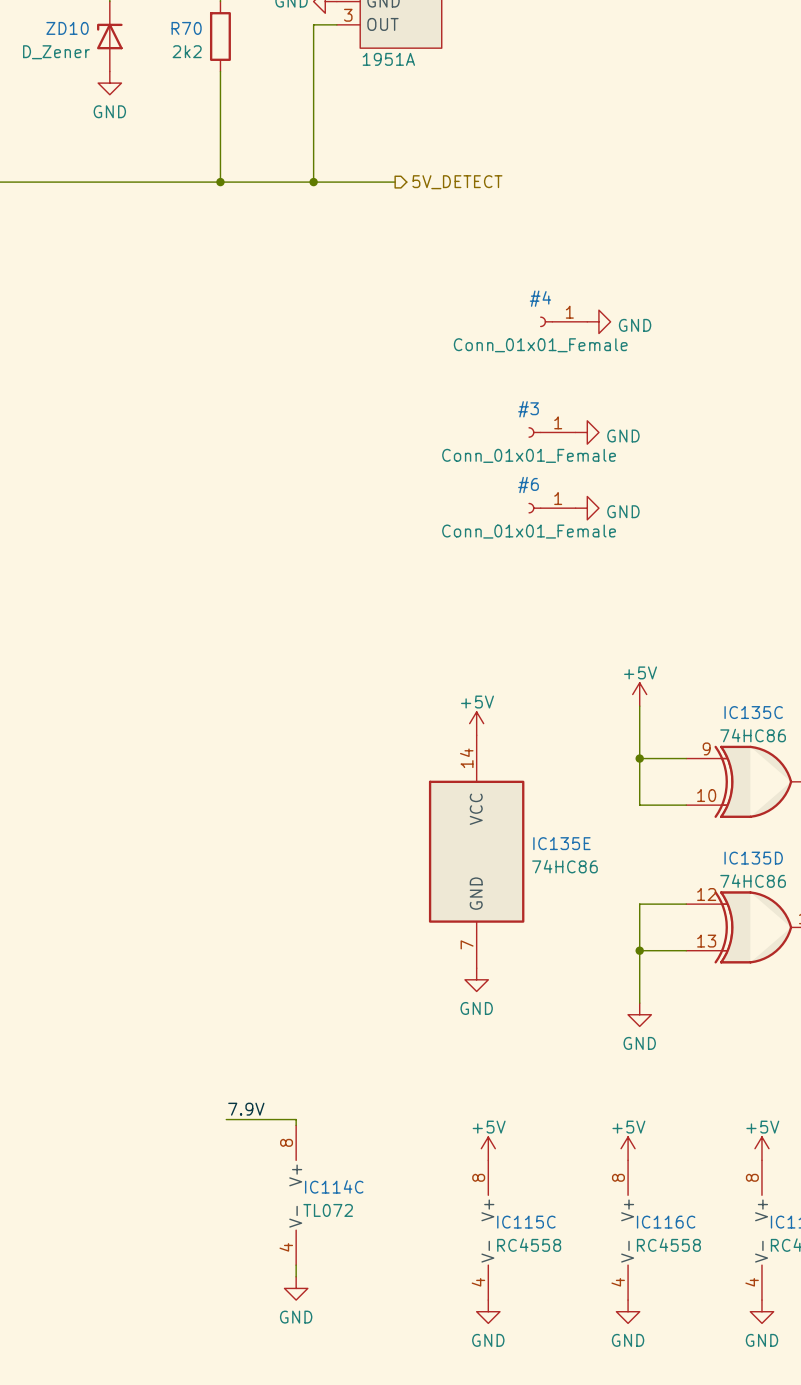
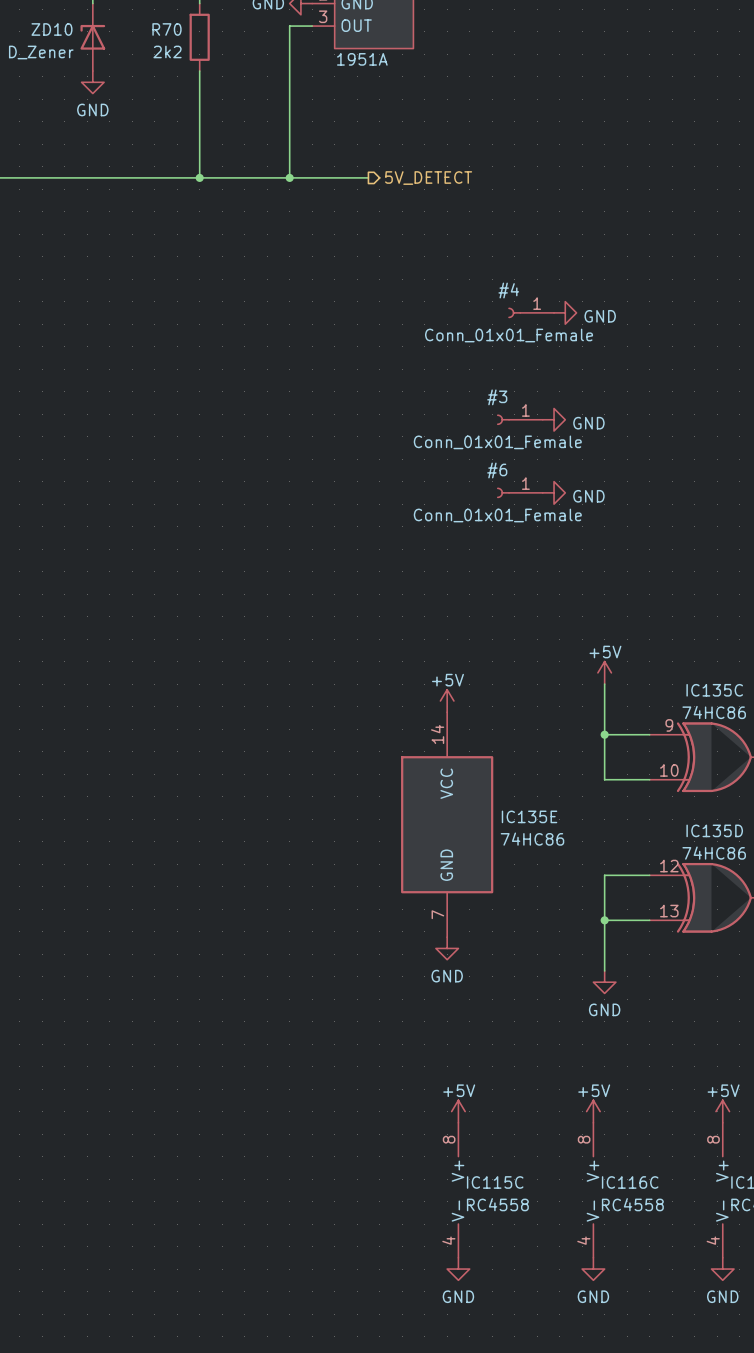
label: 7.9V (246, 1109) -> none
wire: (226, 1119) (296, 1119) (296, 1125) -> none
IC114C: TL072 (296, 1195) -> none
wire: (296, 1265) (296, 1276) -> none
power symbol: GND (296, 1288) -> none

